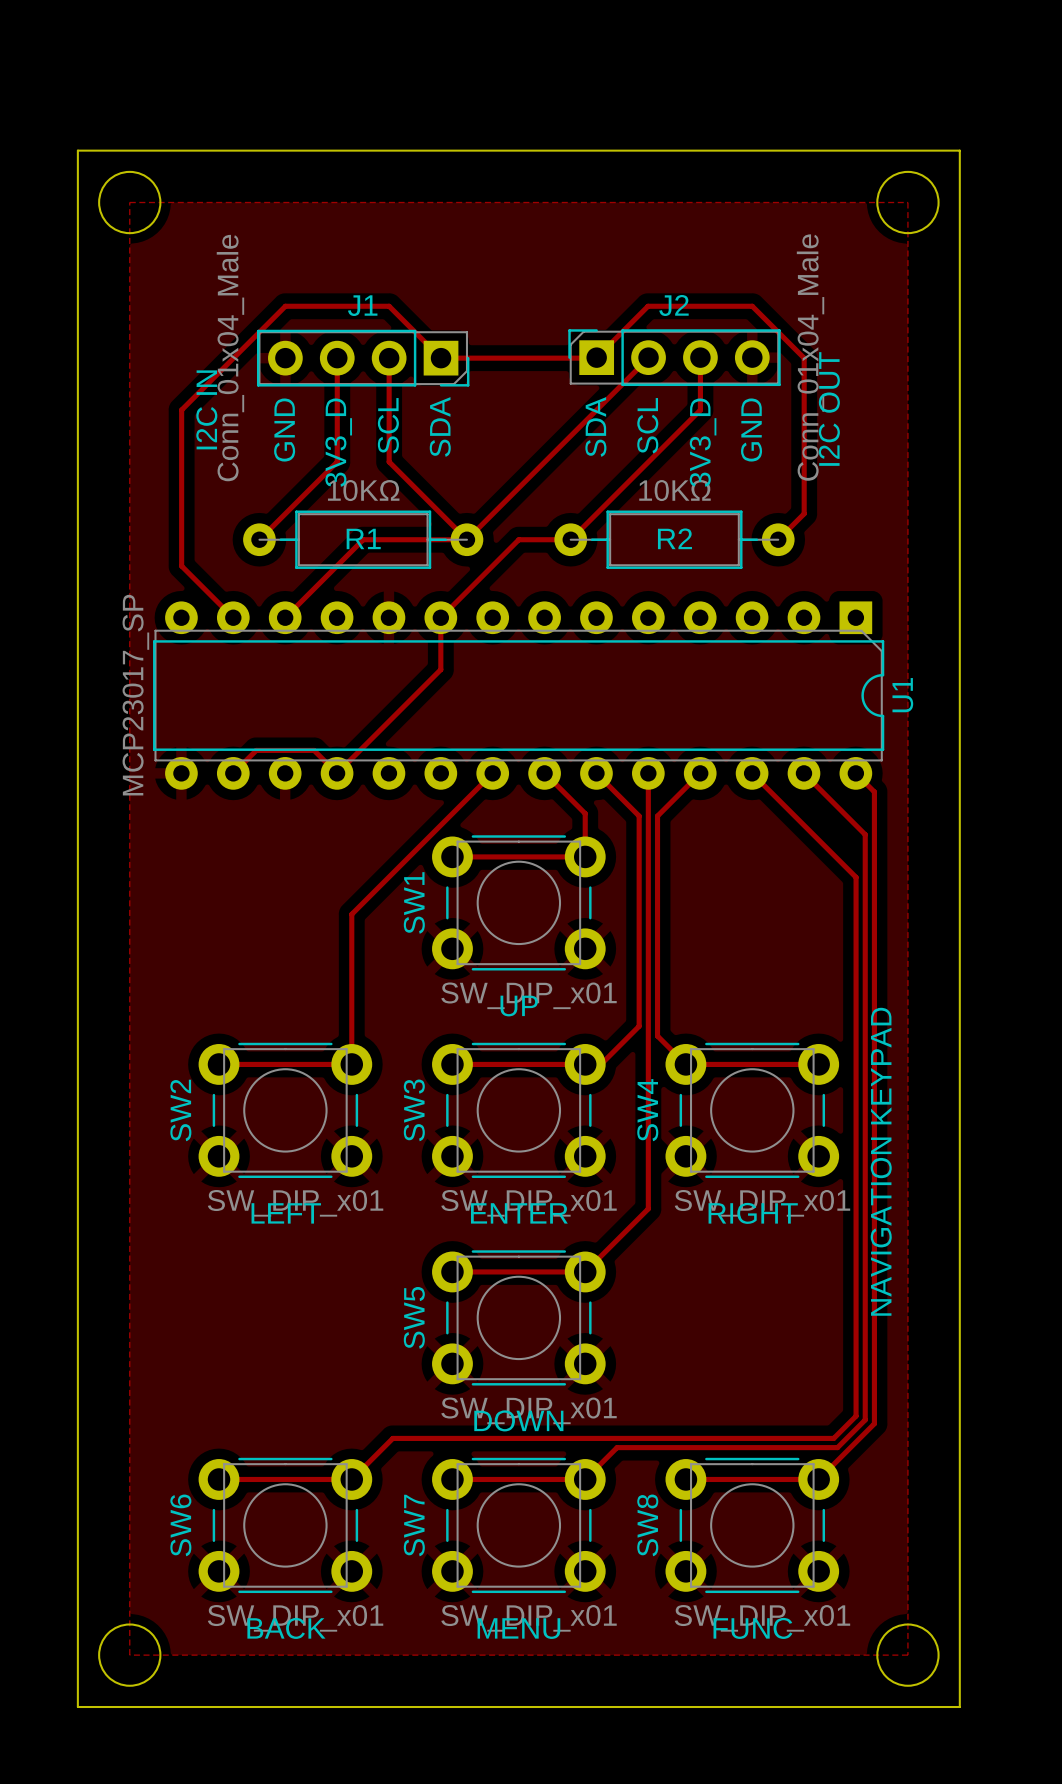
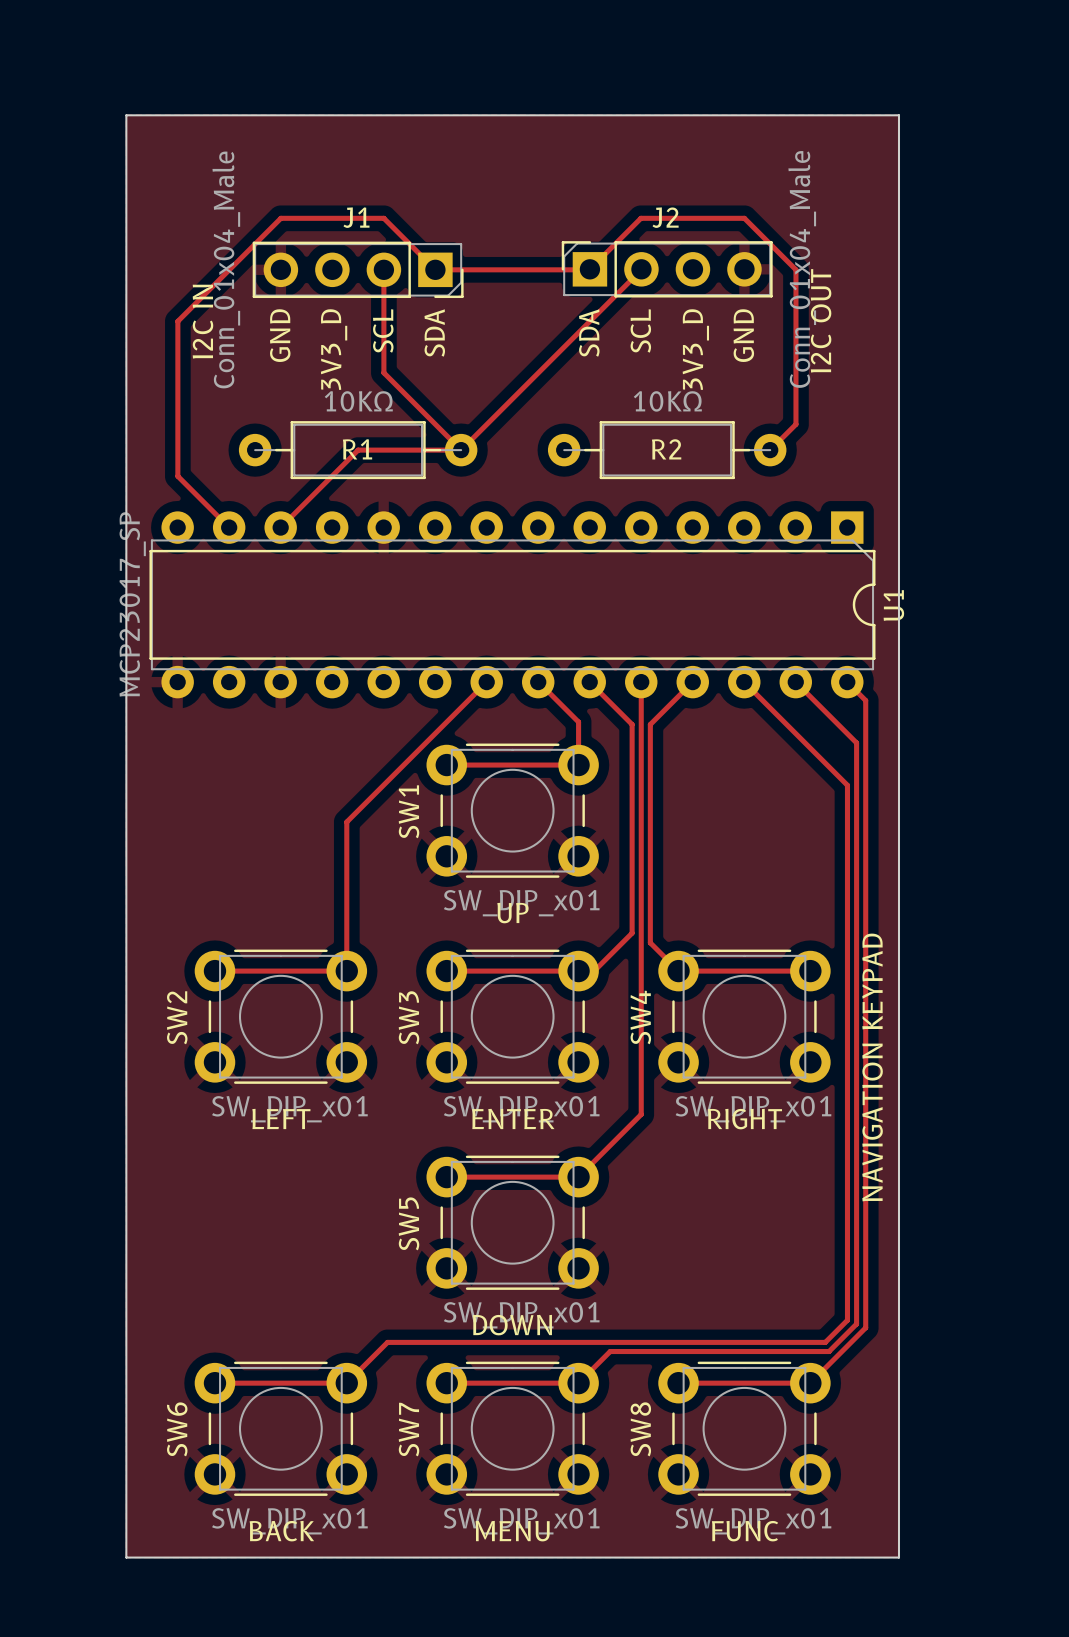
board edge: (77, 150) (959, 150) (959, 1707) (77, 1707) (77, 150) -> (126, 115) (126, 1557) (898, 1557) (898, 115) (126, 115)
round board edge: [98, 170, 162, 235] -> none
round board edge: [876, 170, 940, 235] -> none
track: (700, 357) (700, 410) (570, 539) (518, 539) (441, 617) -> none
track: (337, 358) (337, 461) (259, 539) -> none
track: (440, 617) (440, 669) (337, 773) (314, 750) (256, 750) (233, 773) -> none
round board edge: [98, 1623, 162, 1687] -> none
round board edge: [876, 1623, 940, 1687] -> none

